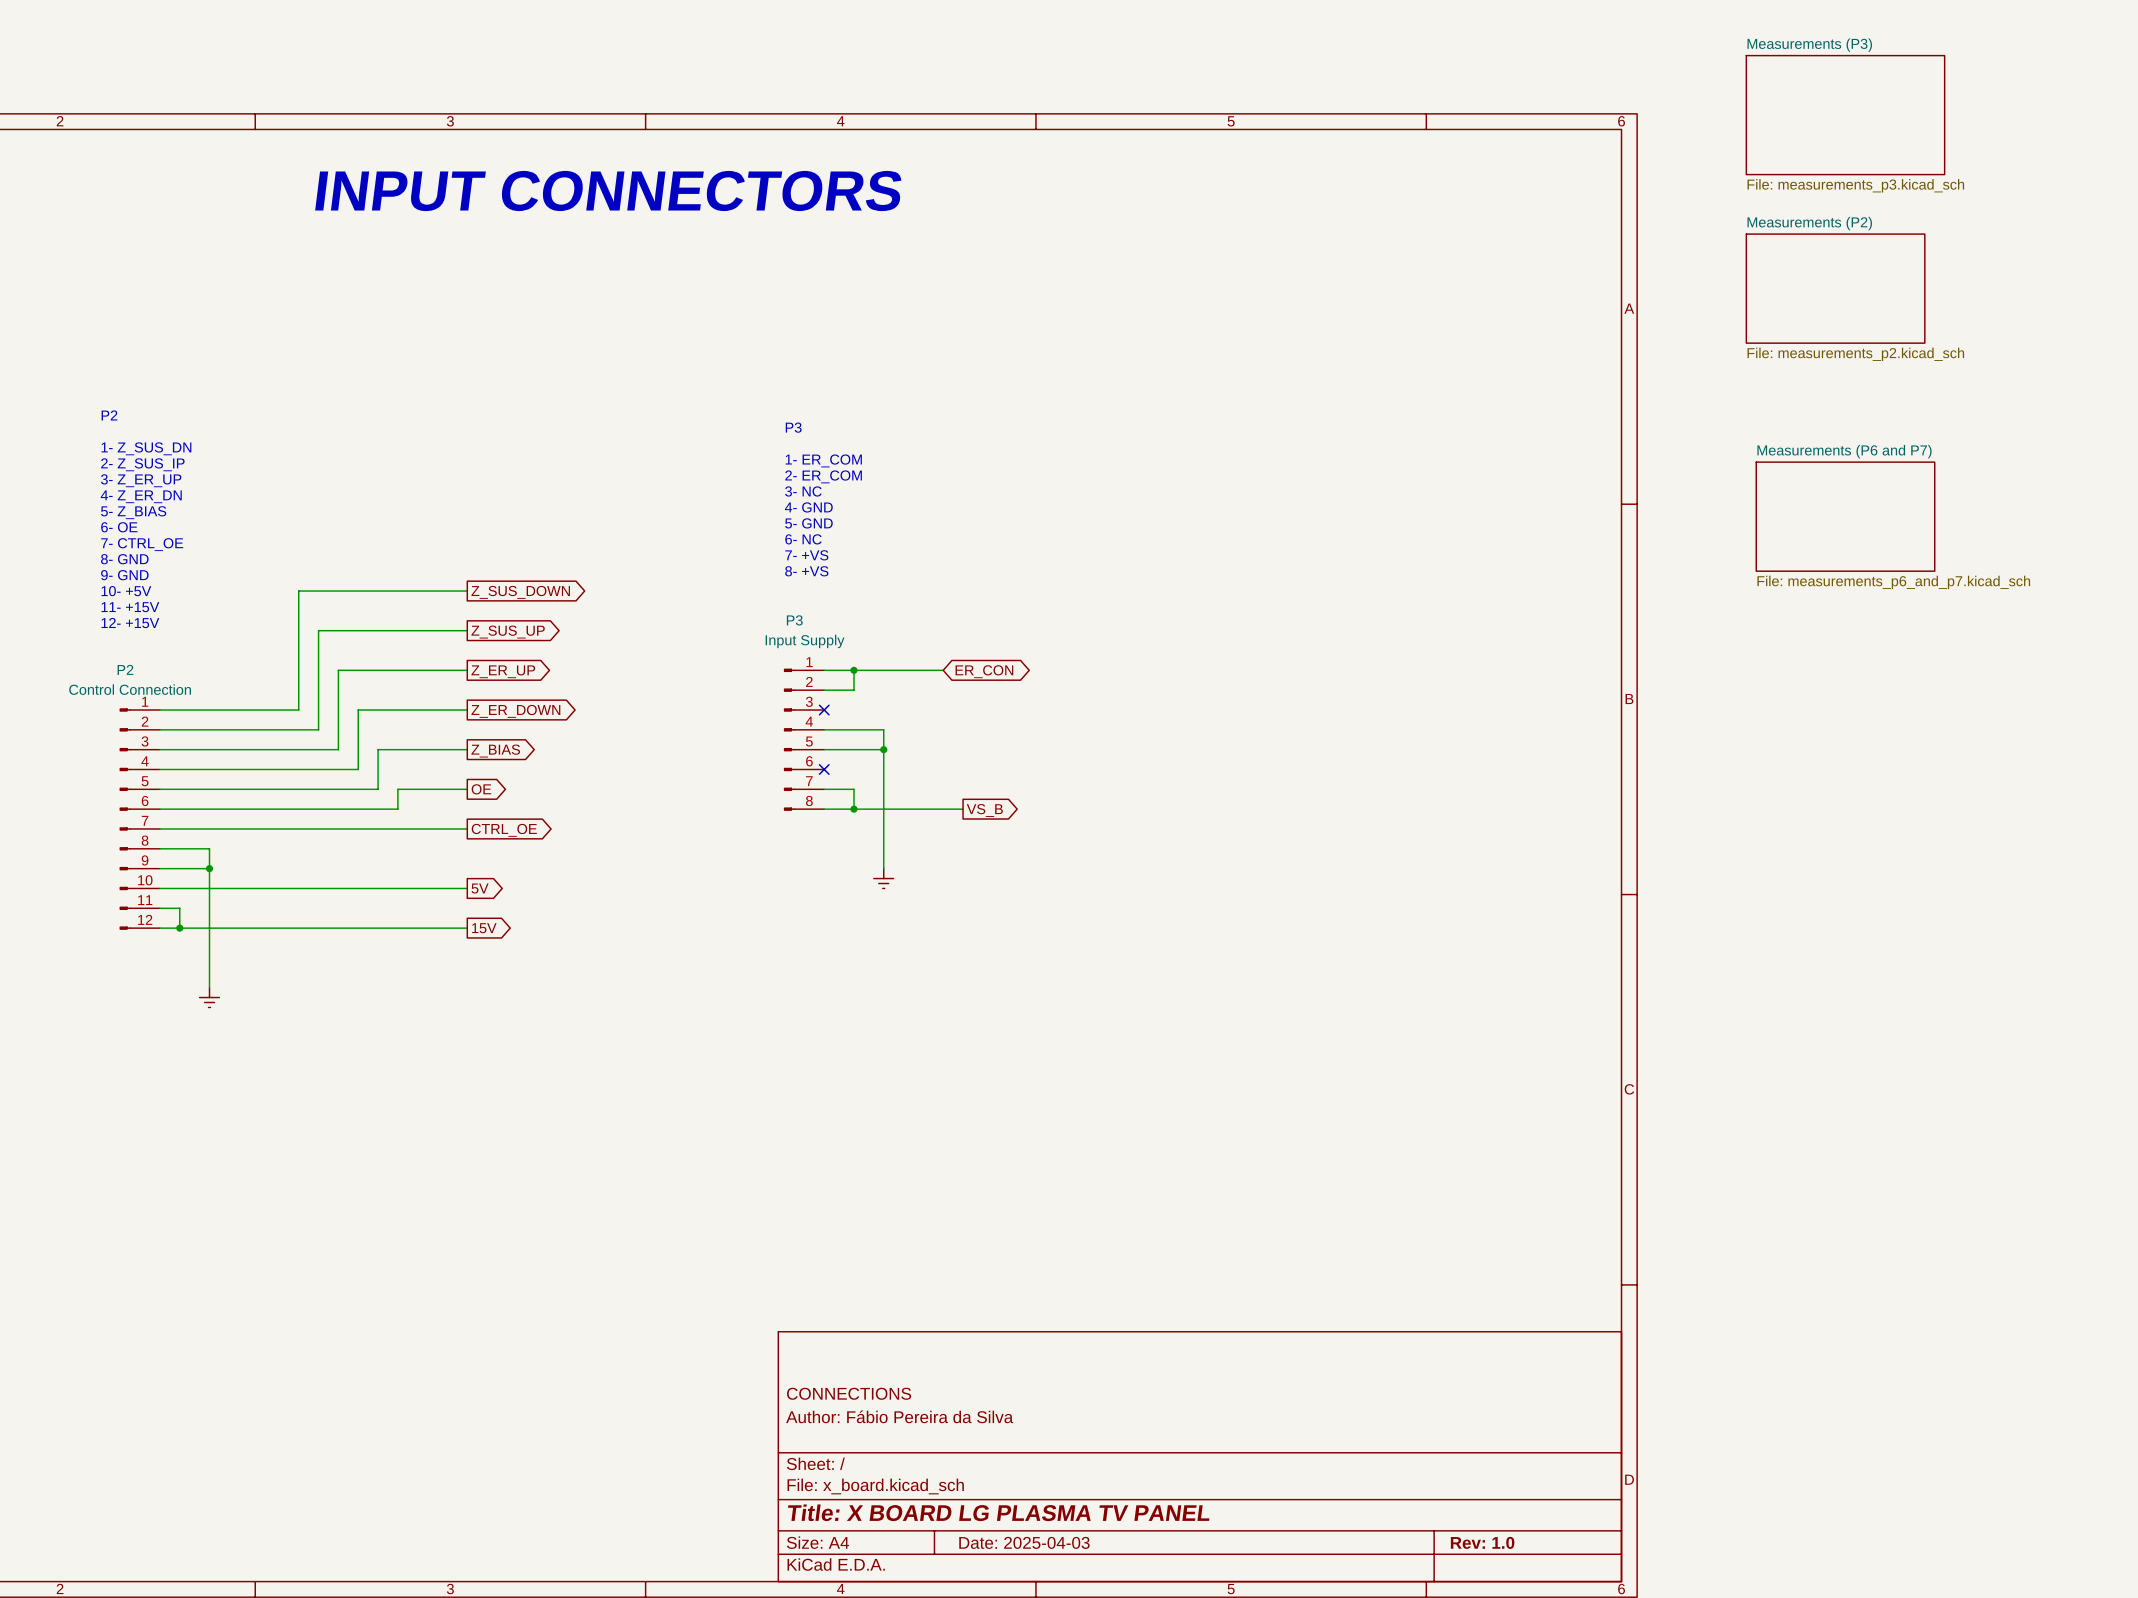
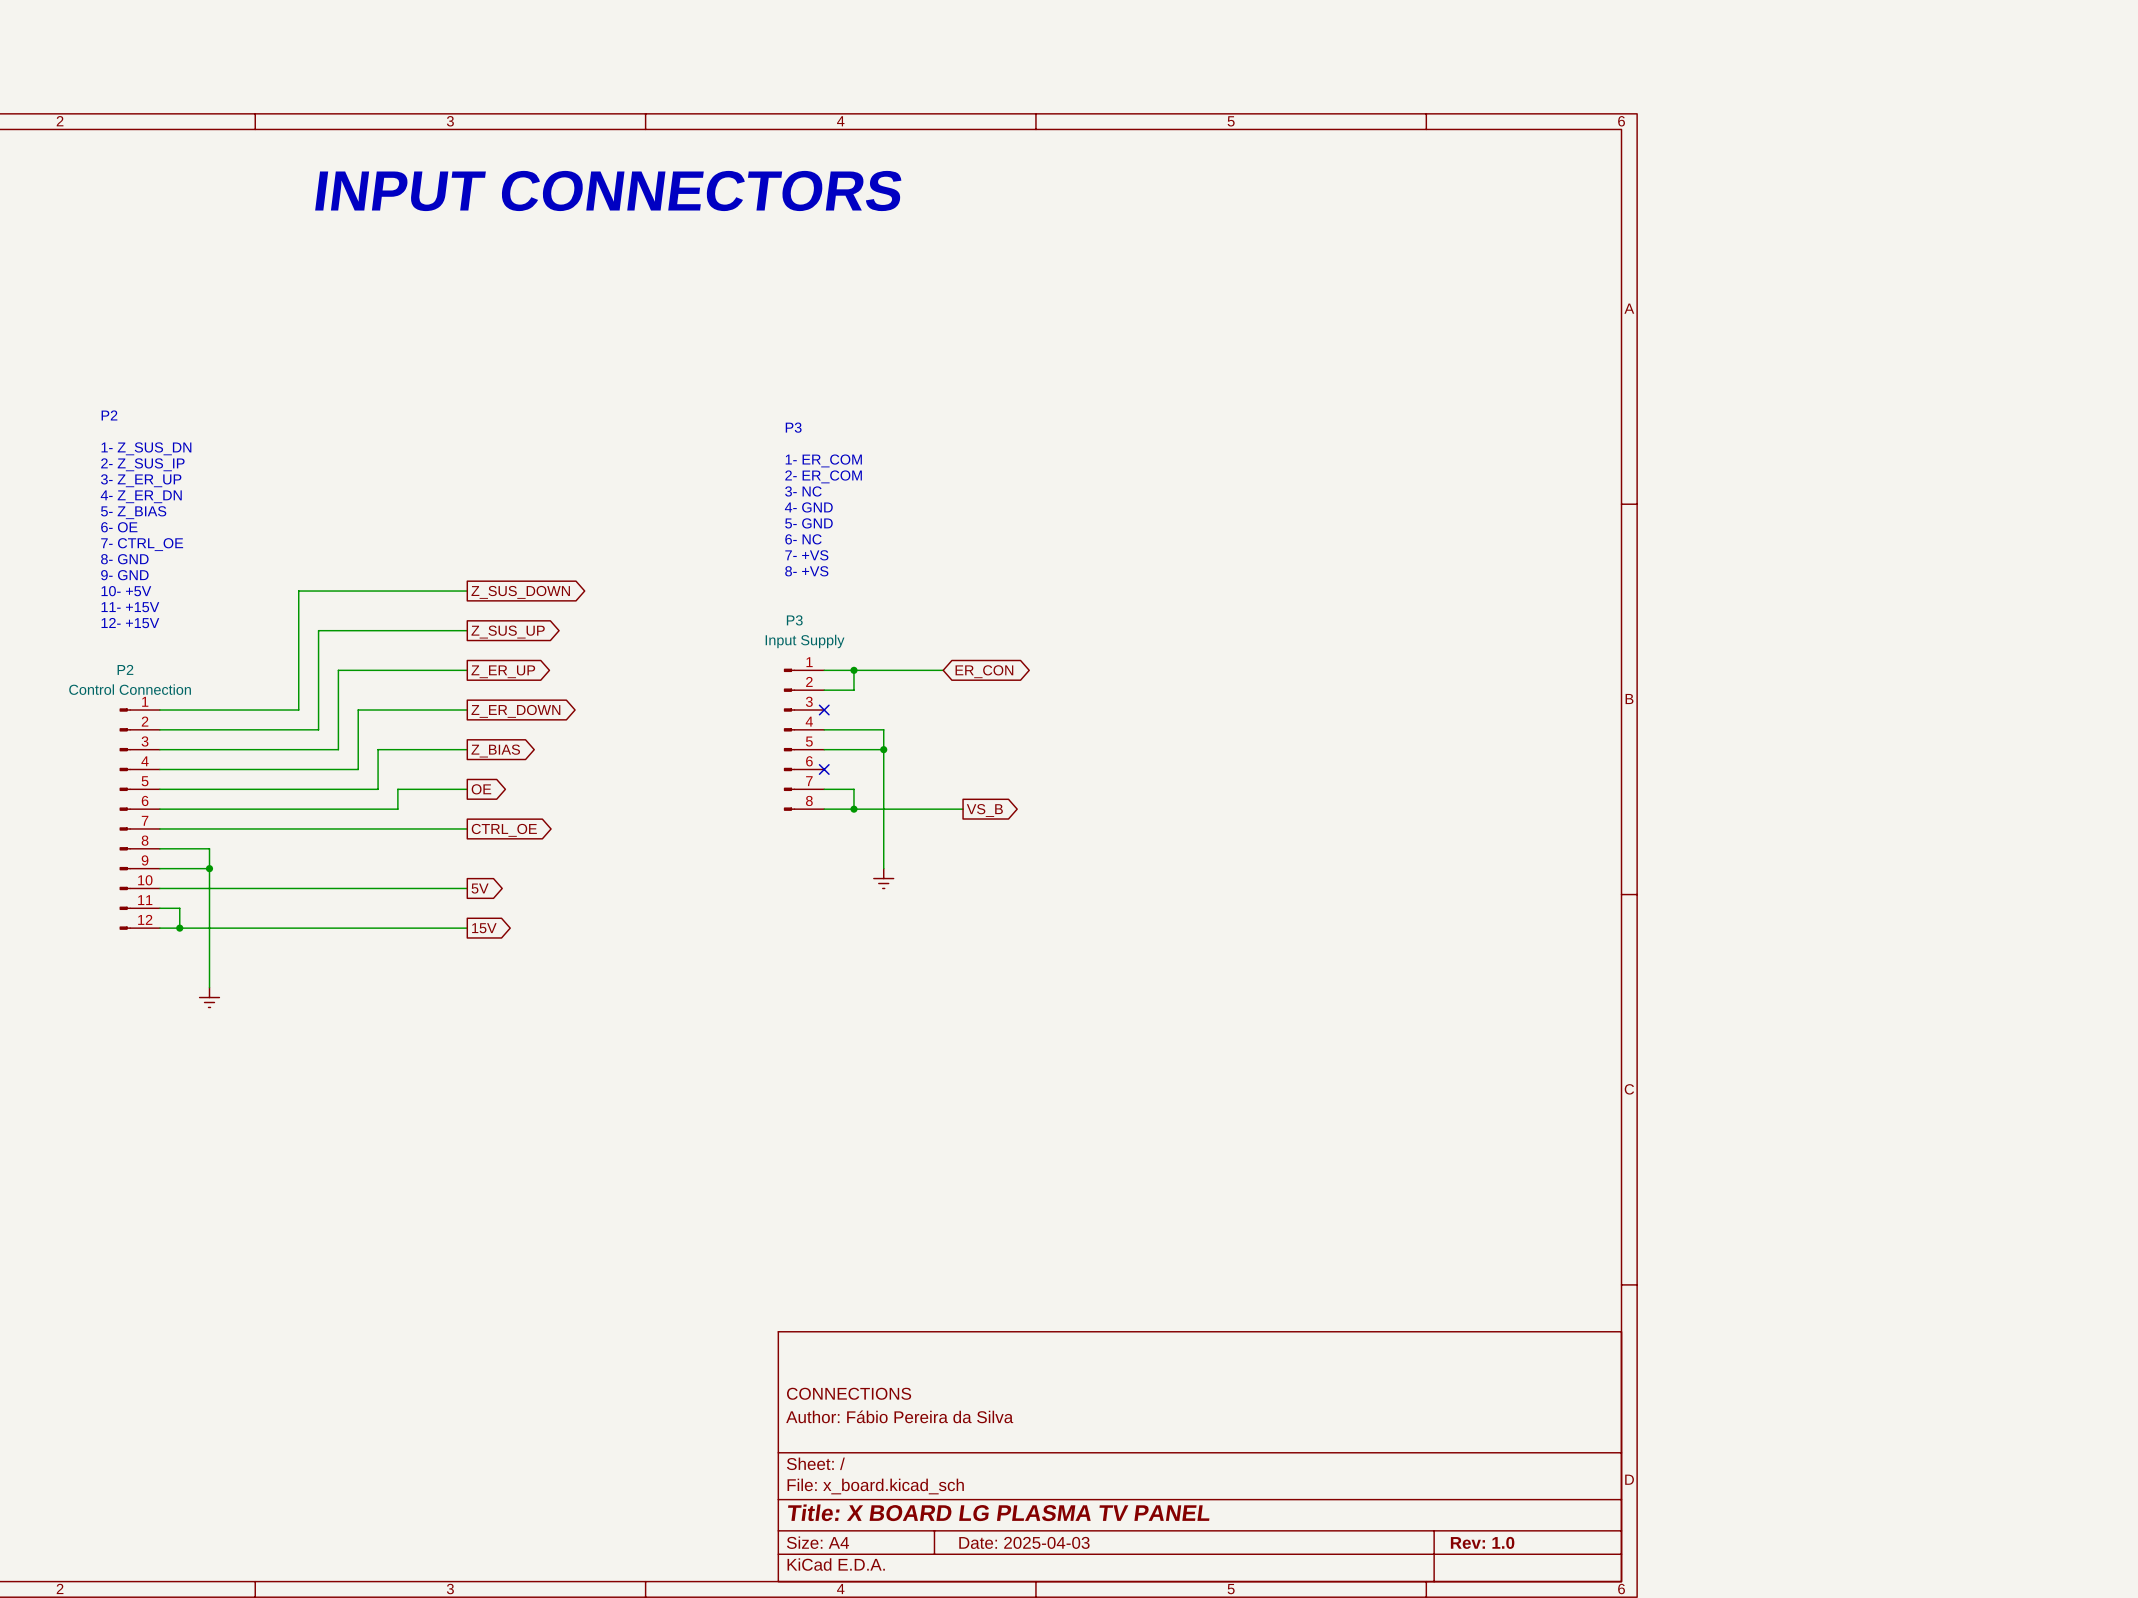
sheet Measurements (P3): File: measurements_p3.kicad_sch (1845, 115) -> none
sheet Measurements (P2): File: measurements_p2.kicad_sch (1835, 288) -> none
sheet Measurements (P6 and P7): File: measurements_p6_and_p7.kicad_sch (1845, 516) -> none

